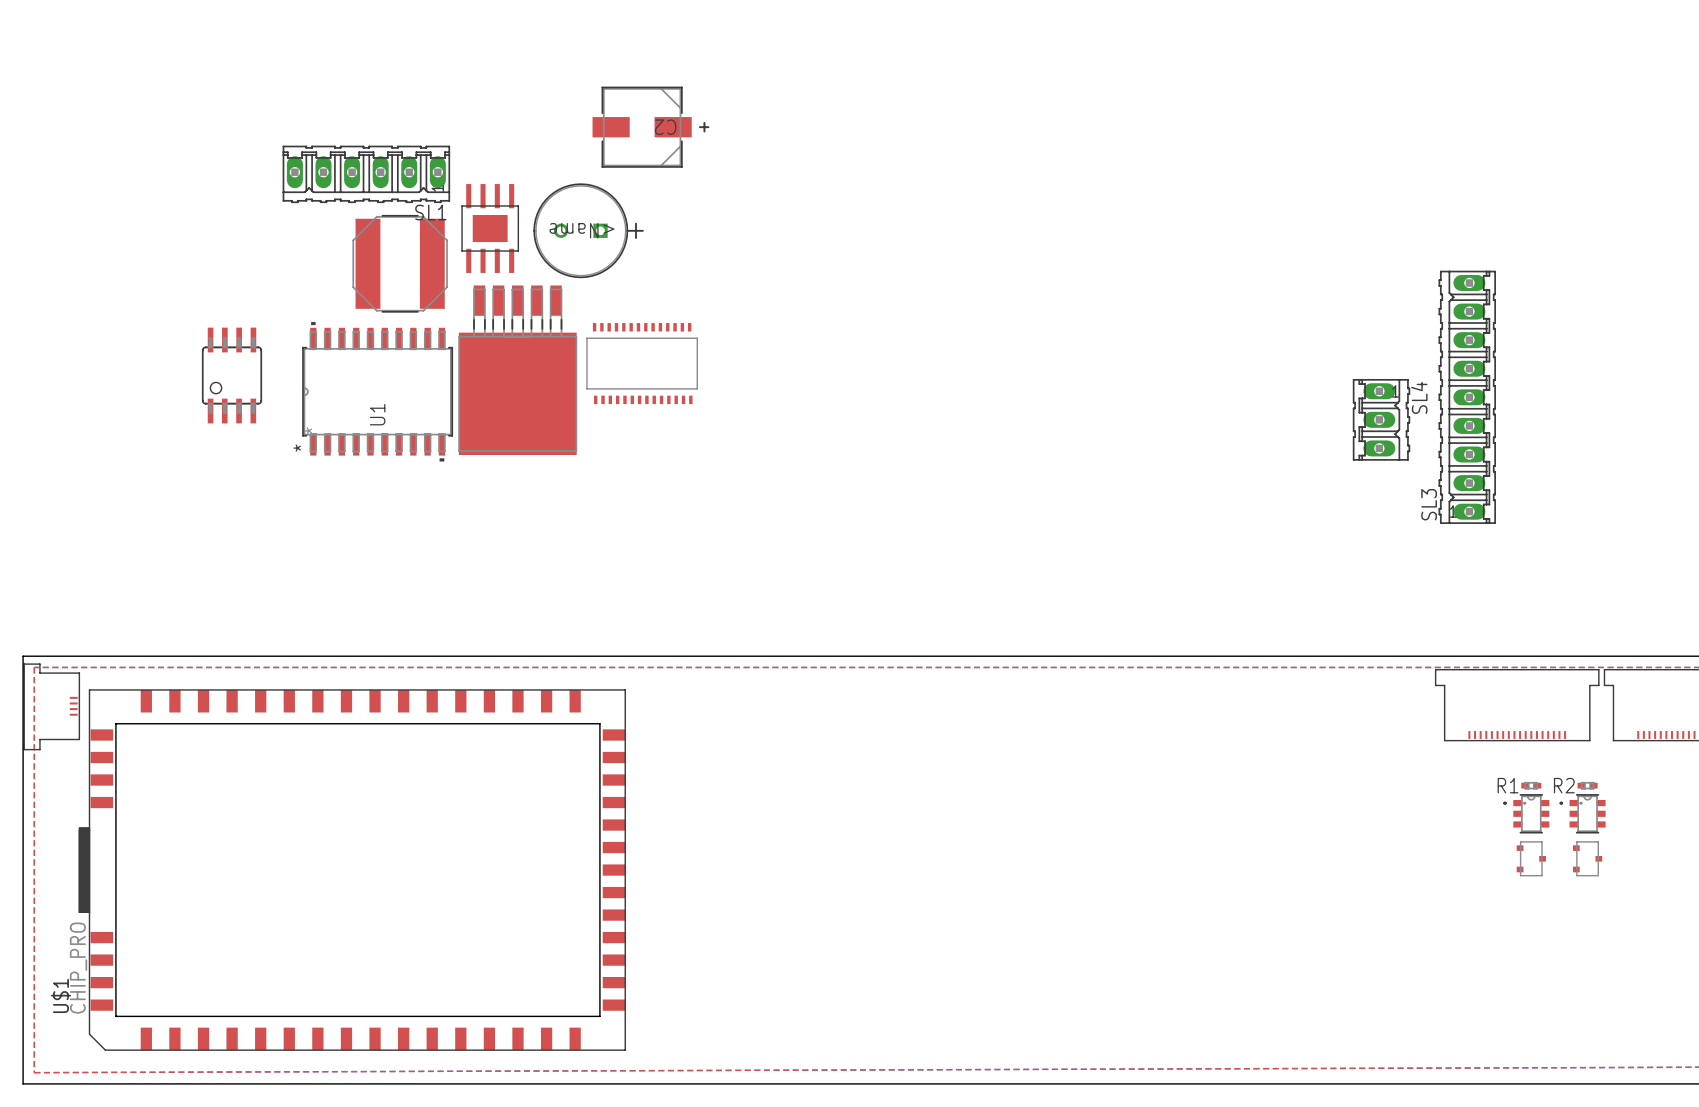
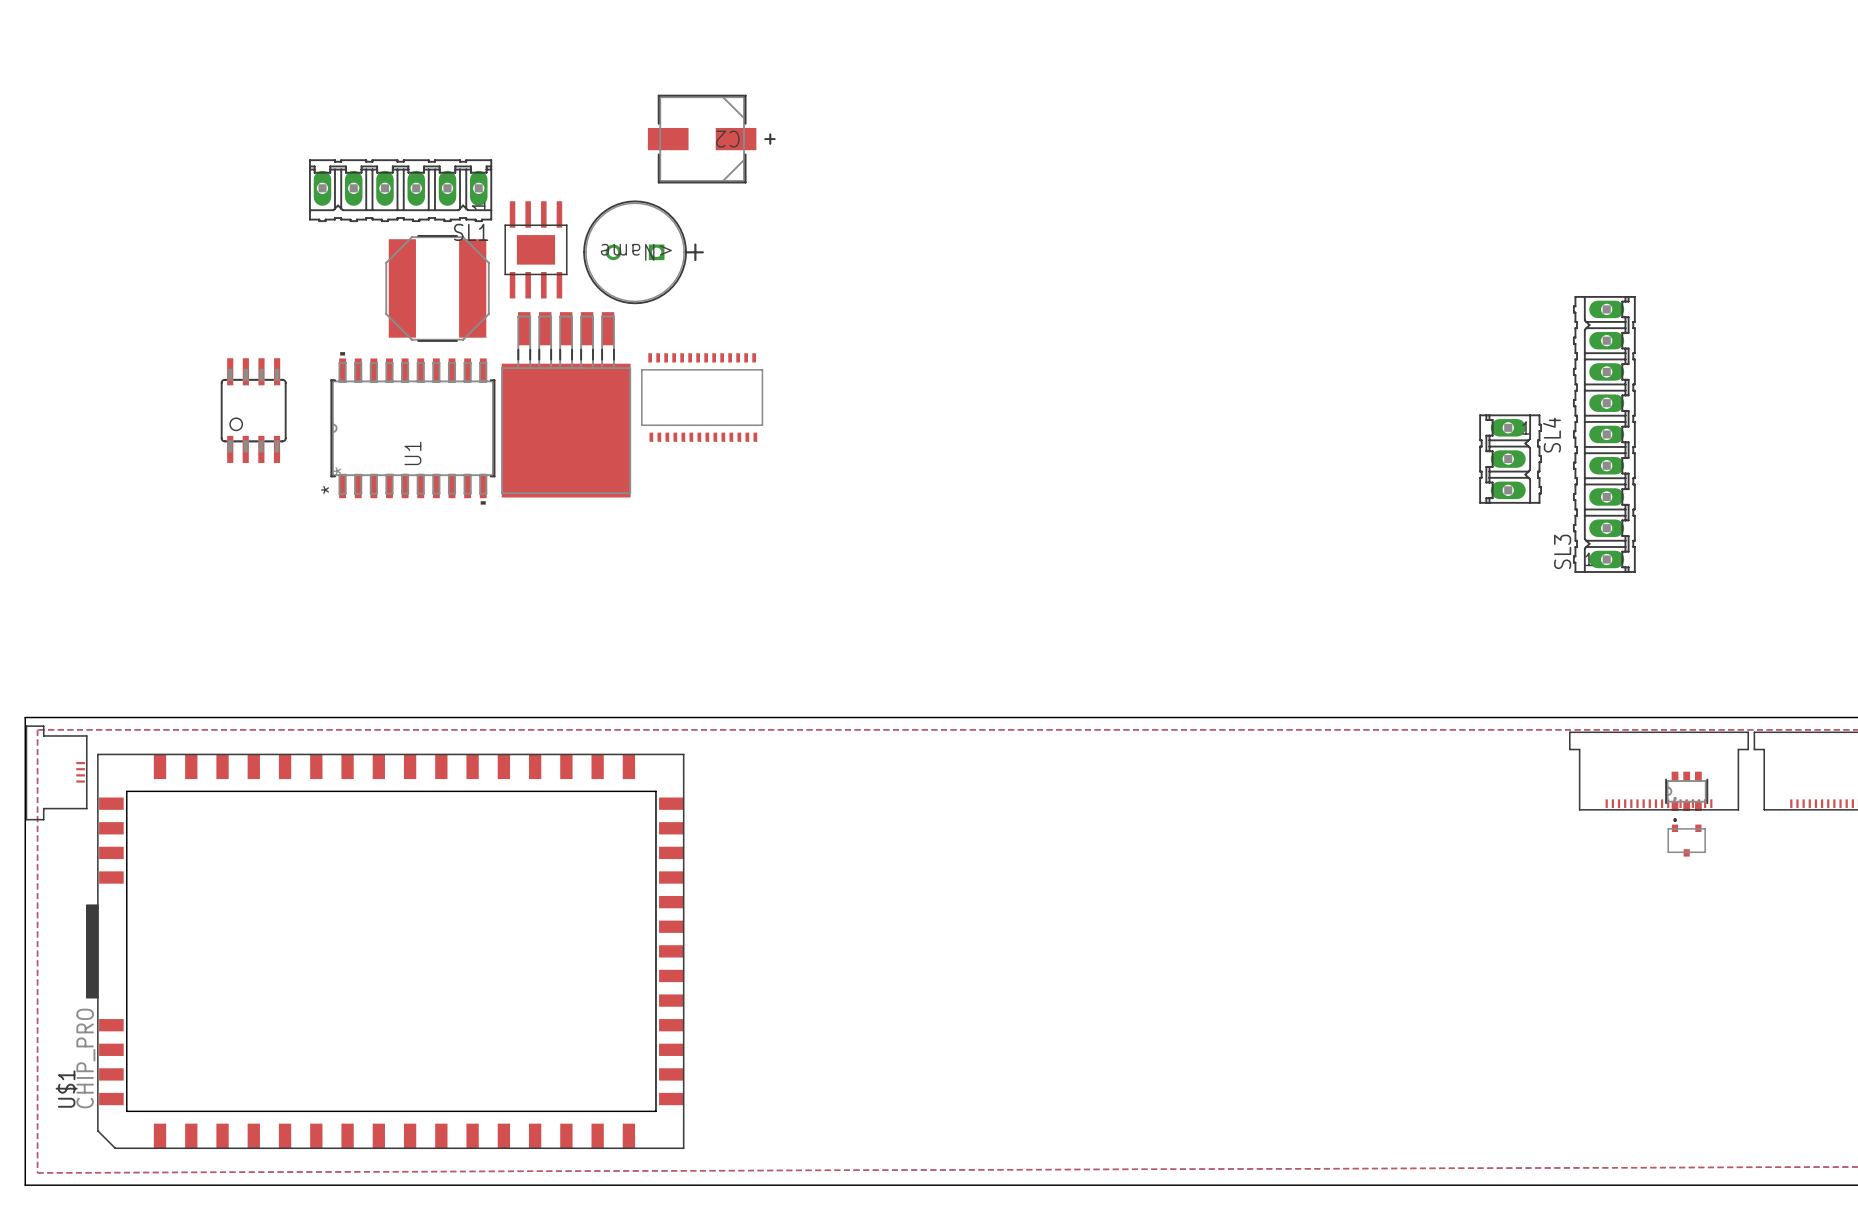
part: none -> (1686, 796)
part: none -> (1686, 840)
R1: (1531, 785) -> none
R2: (1587, 785) -> none
part: (1526, 813) -> none
part: (1582, 813) -> none
part: (1531, 858) -> none
part: (1587, 858) -> none

